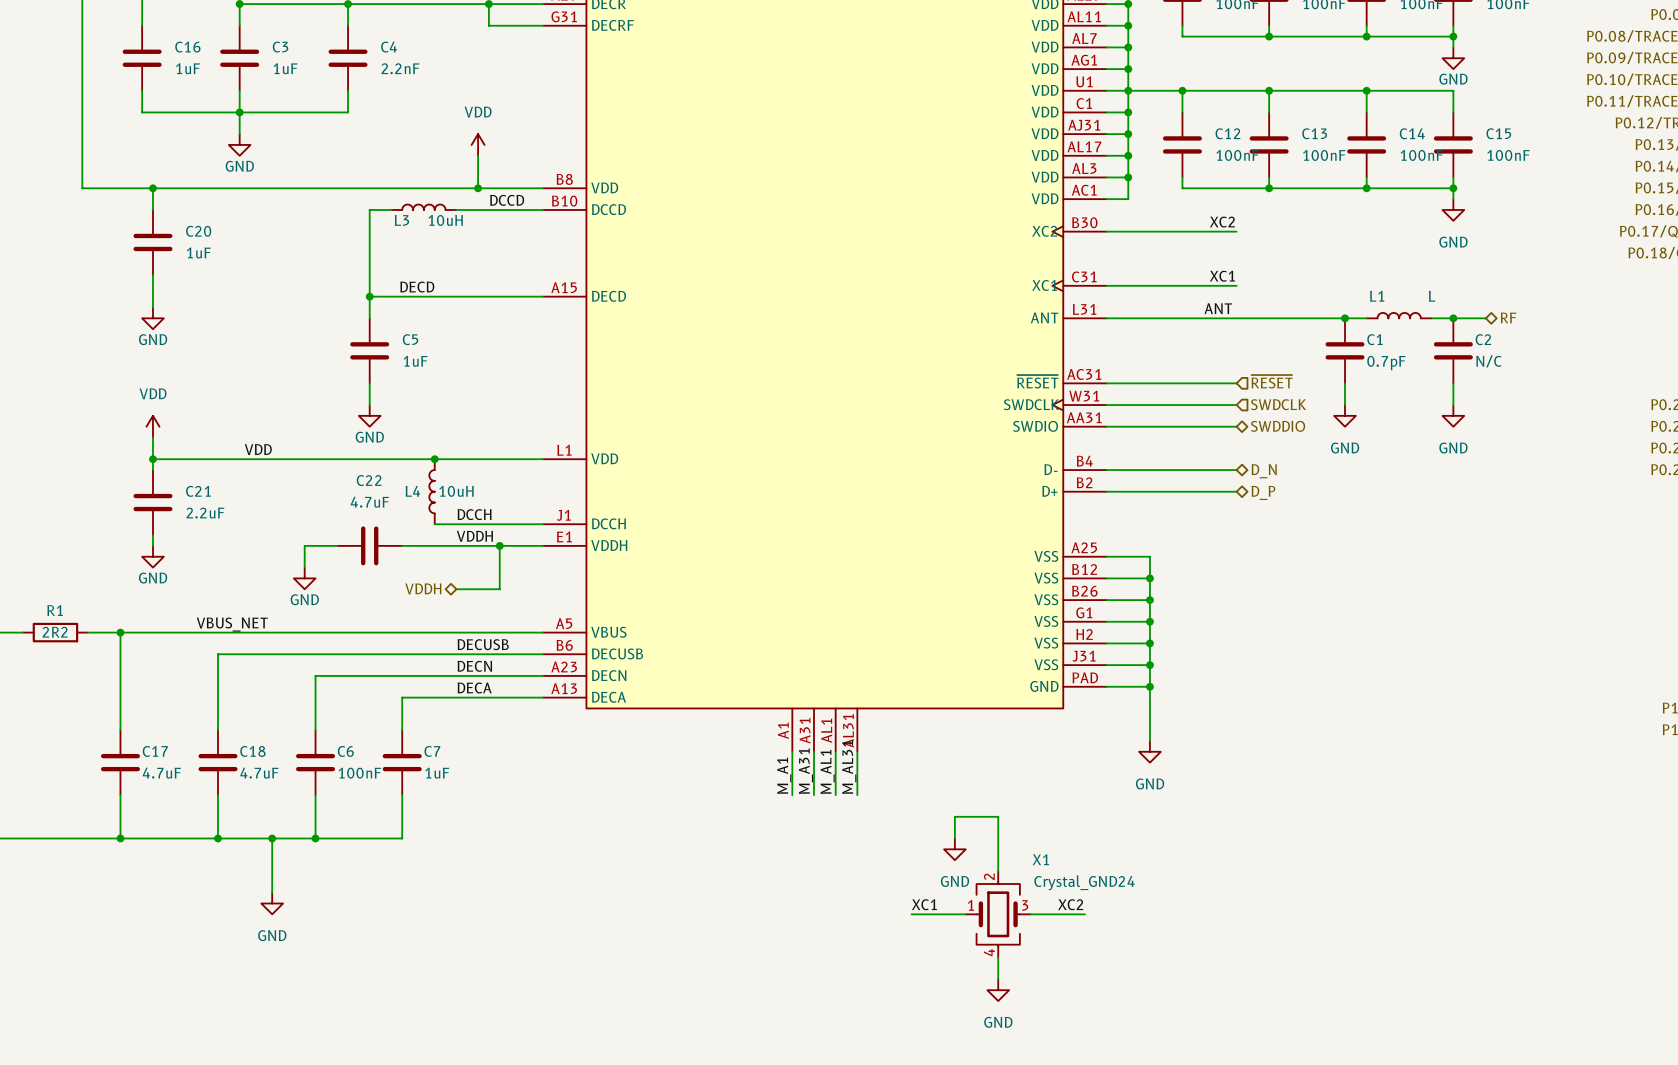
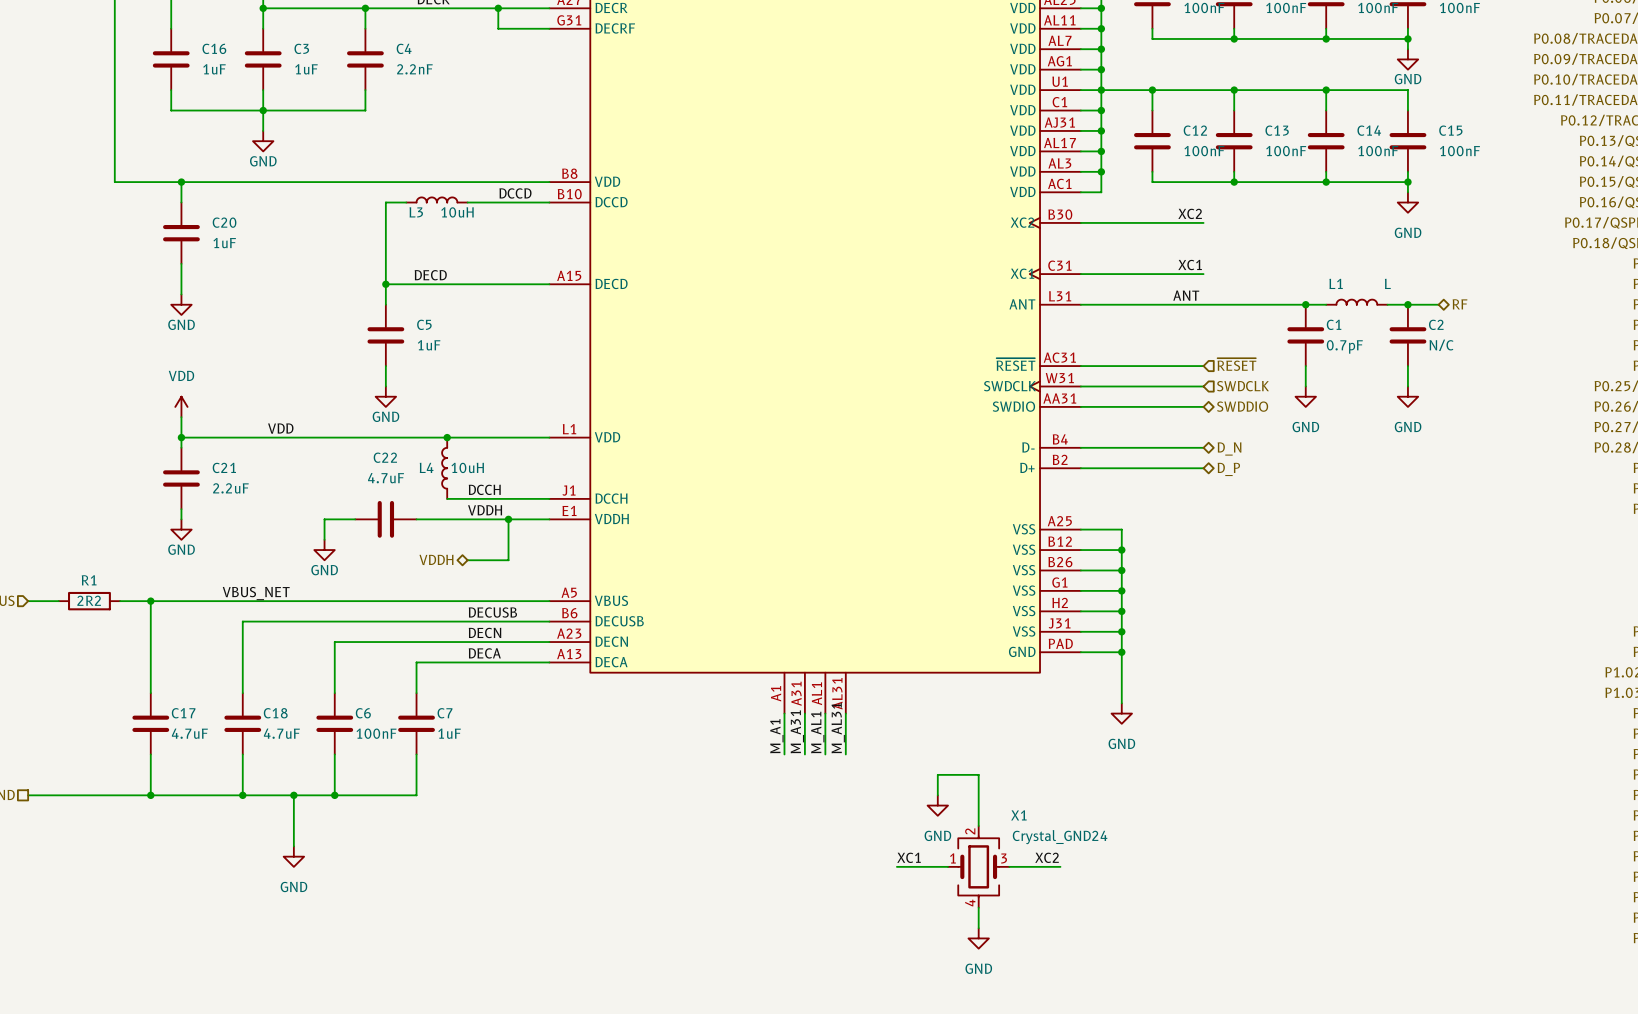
power symbol: VDD (478, 144) -> none
wire: (478, 155) (478, 188) -> none
junction: (478, 188) -> none

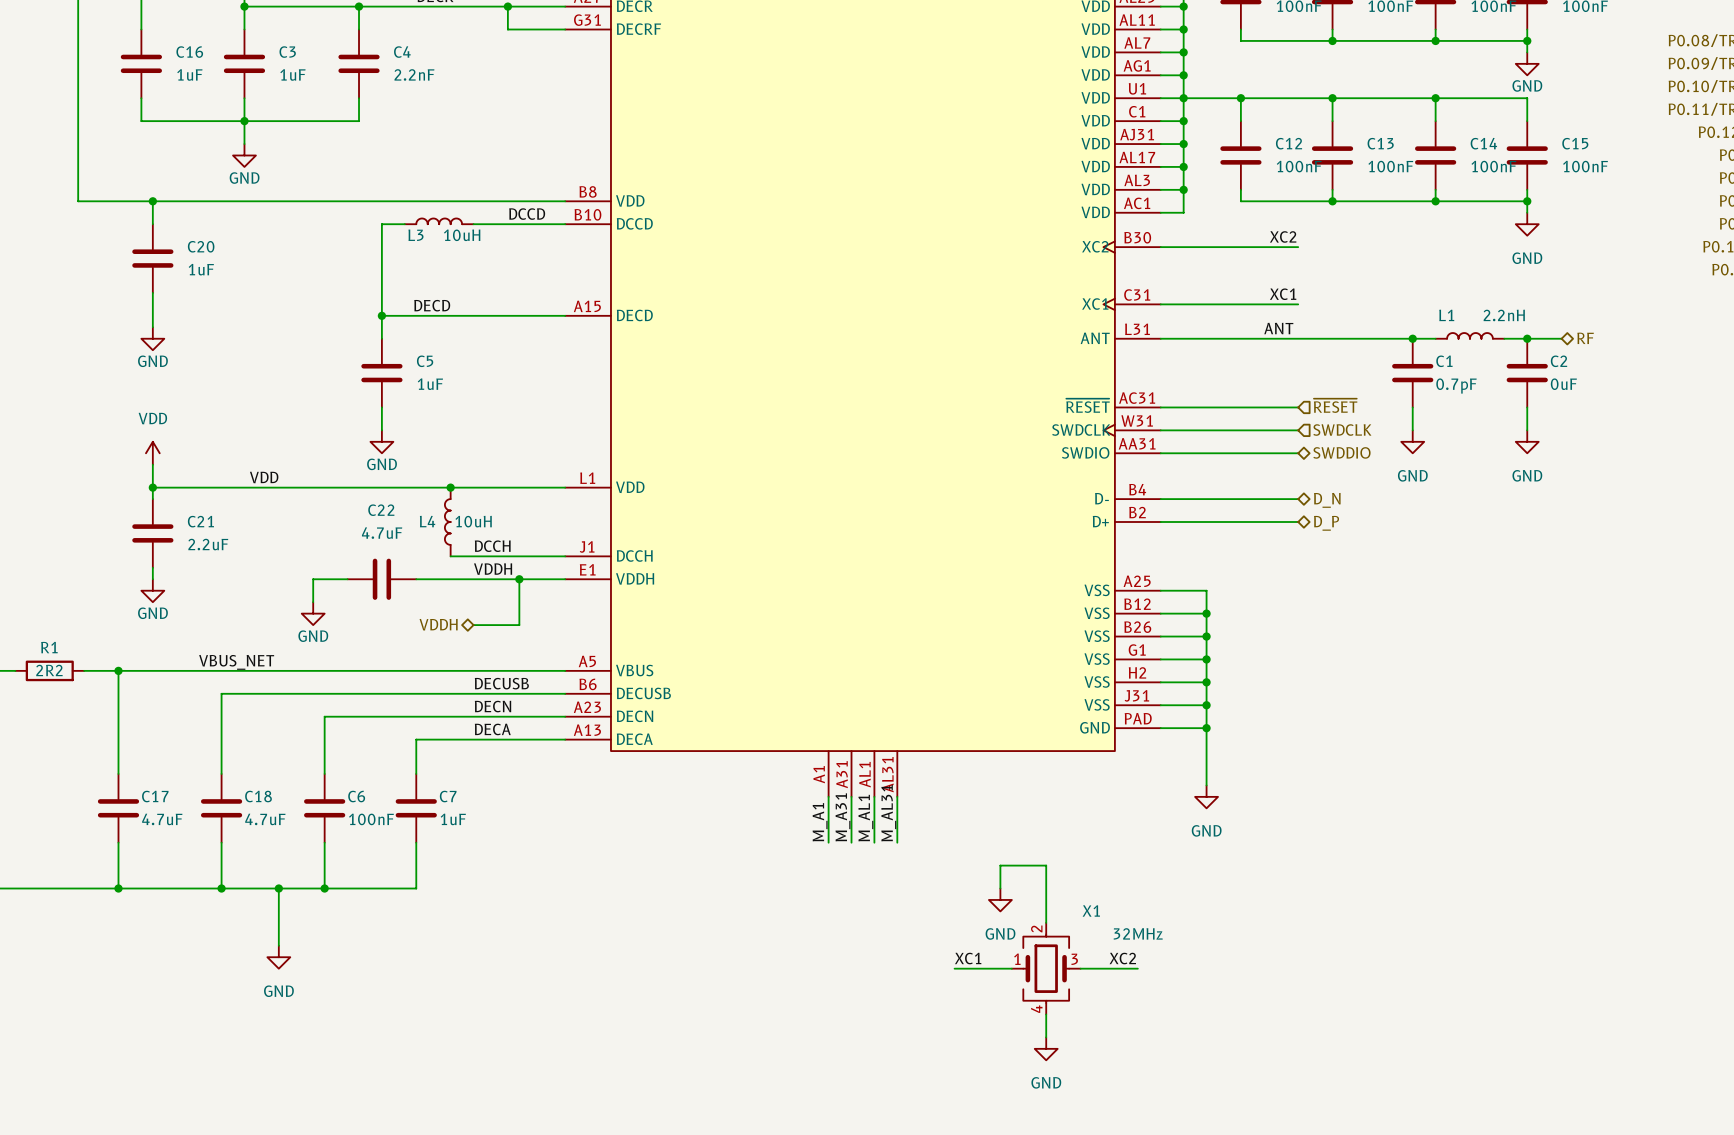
L1 value: L (1387, 283) -> 2.2nH (1504, 315)
C2 value: N/C (1441, 345) -> 0uF (1563, 384)
X1 value: Crystal_GND24 (1060, 837) -> 32MHz (1138, 933)

